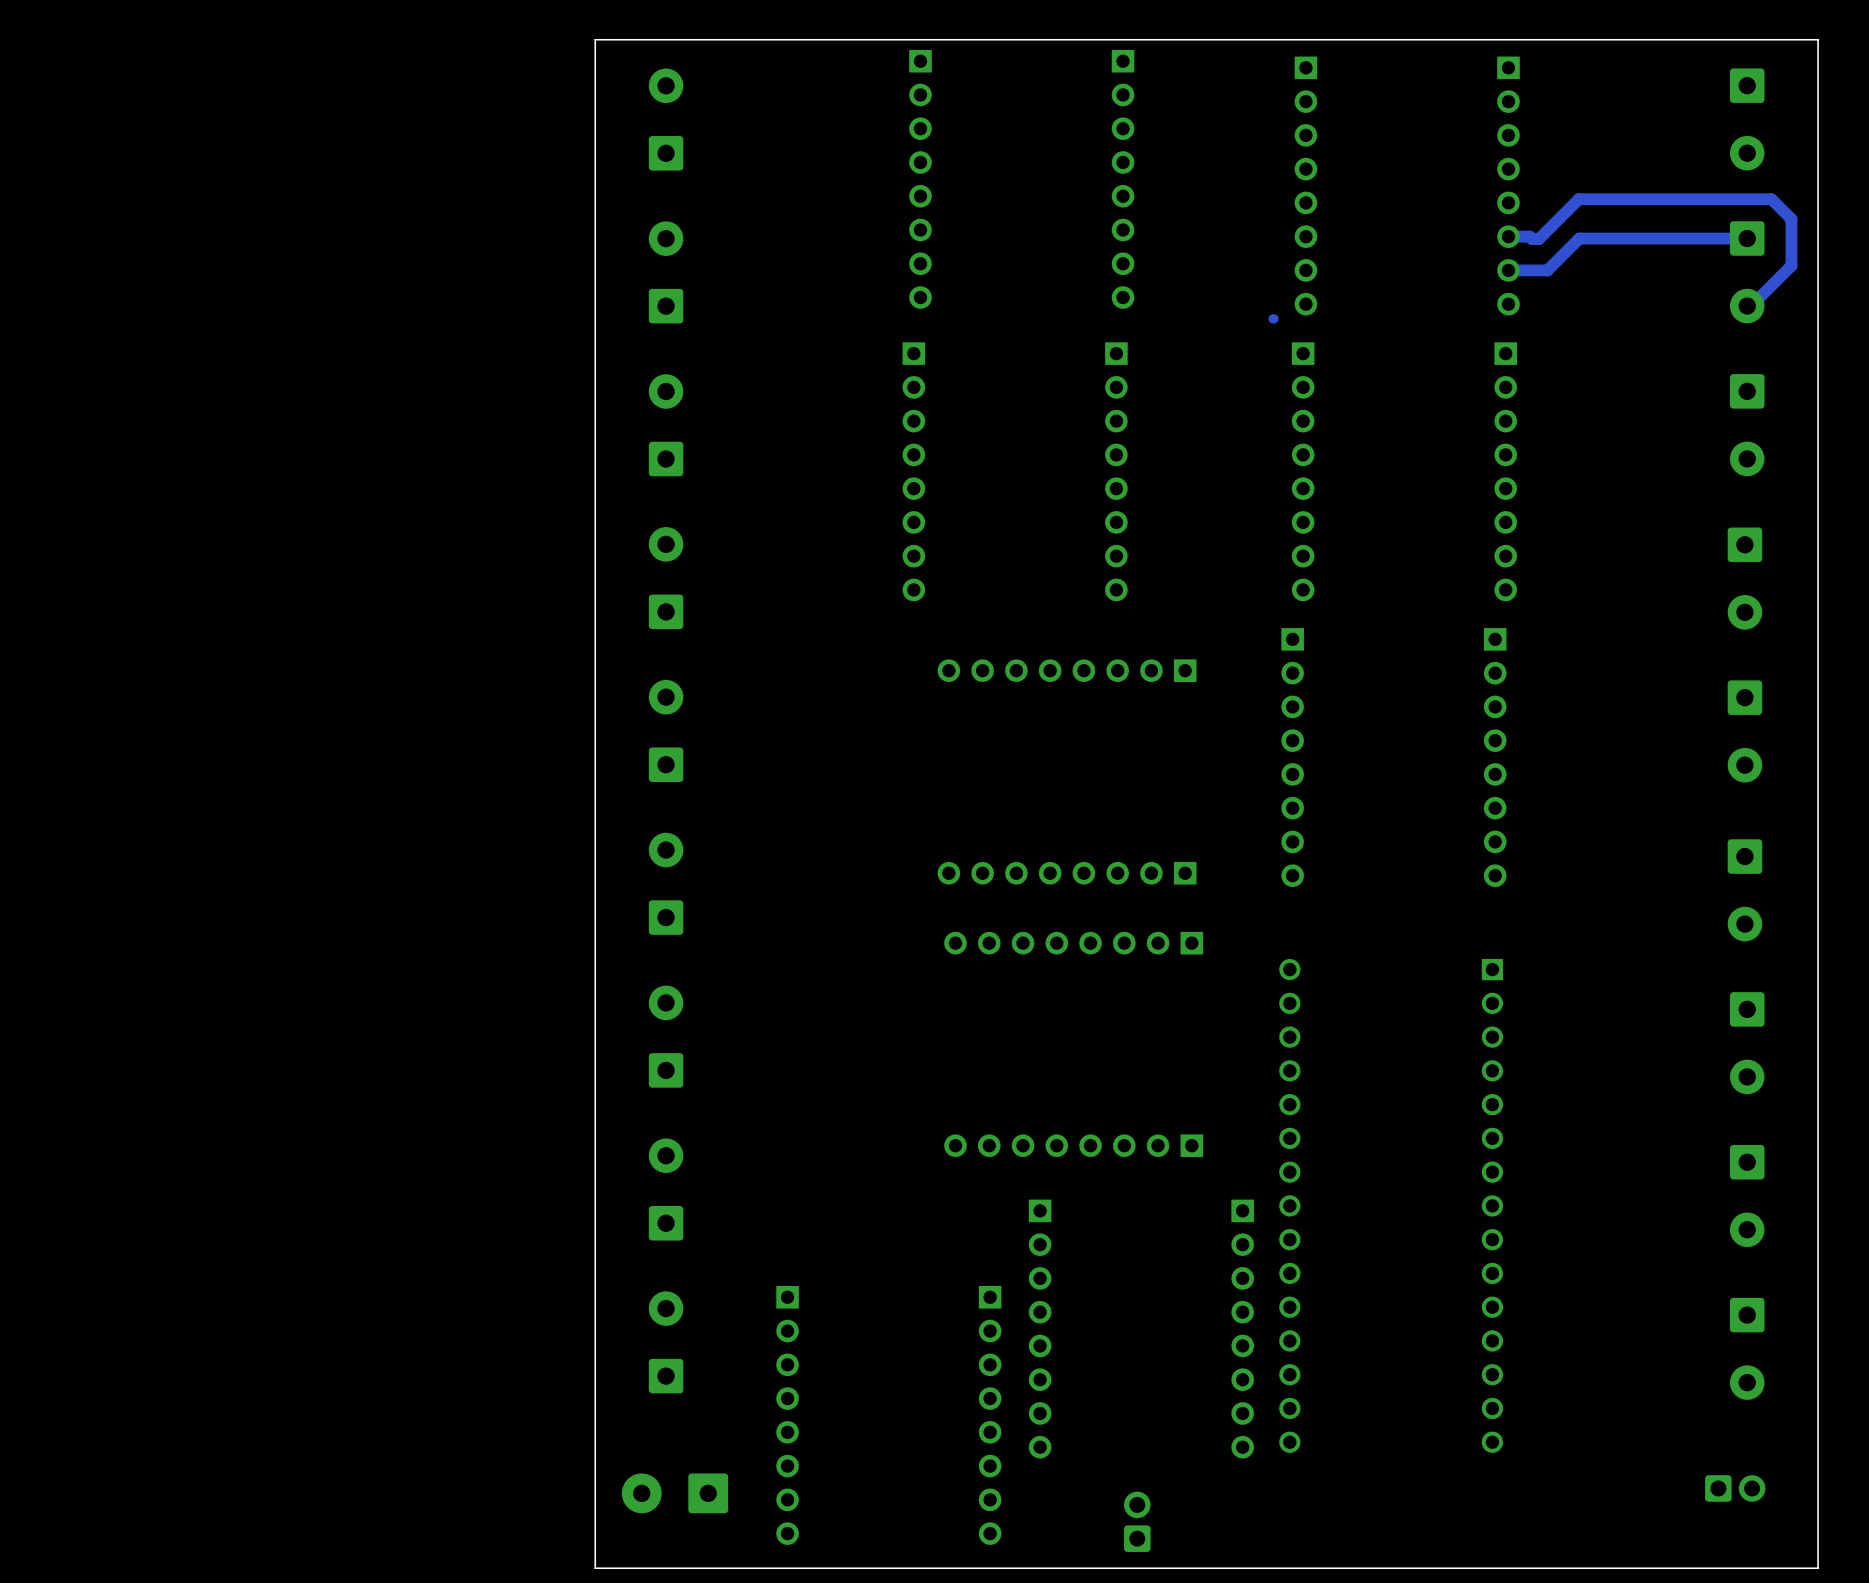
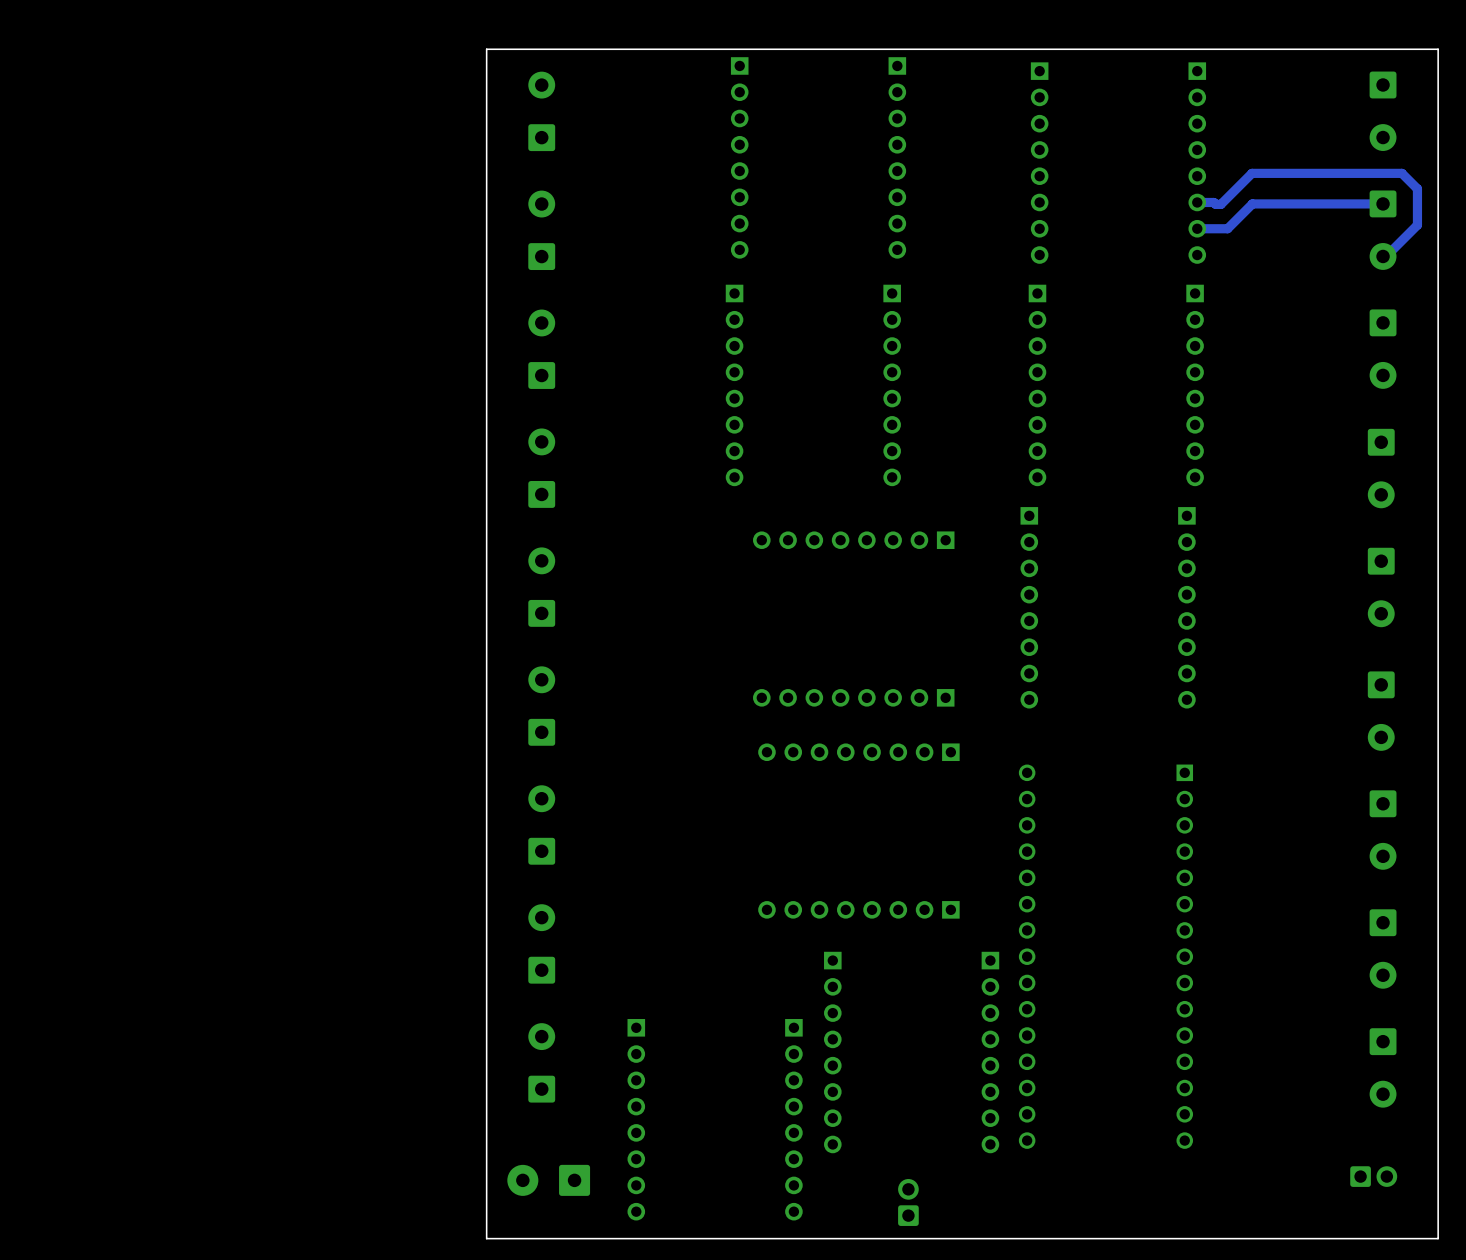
track: (1273, 318) (1273, 318) -> none

